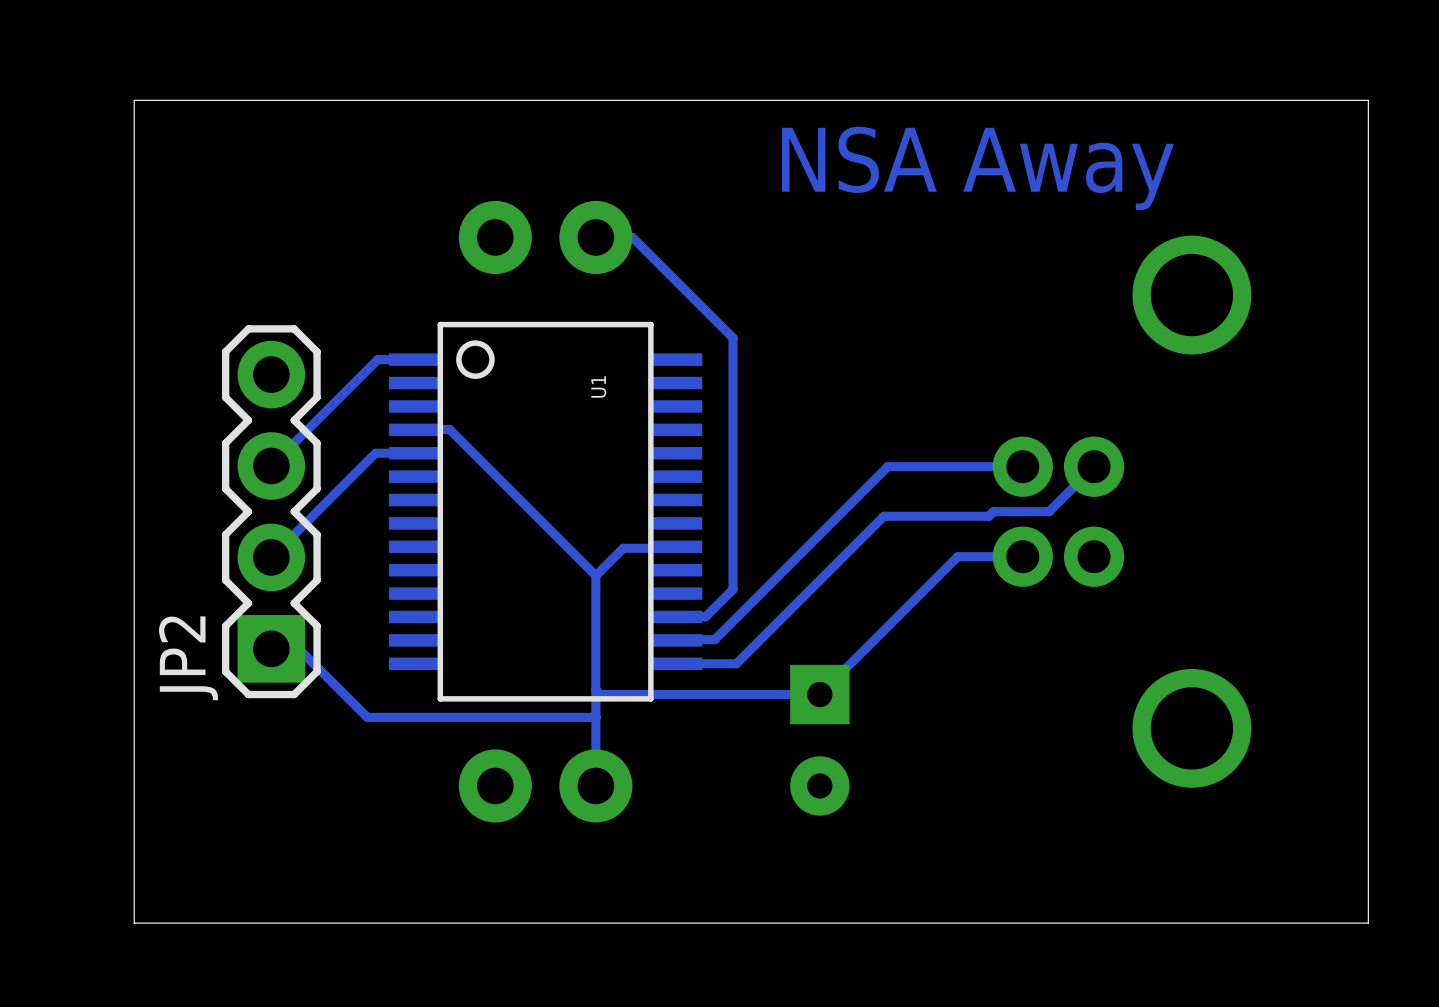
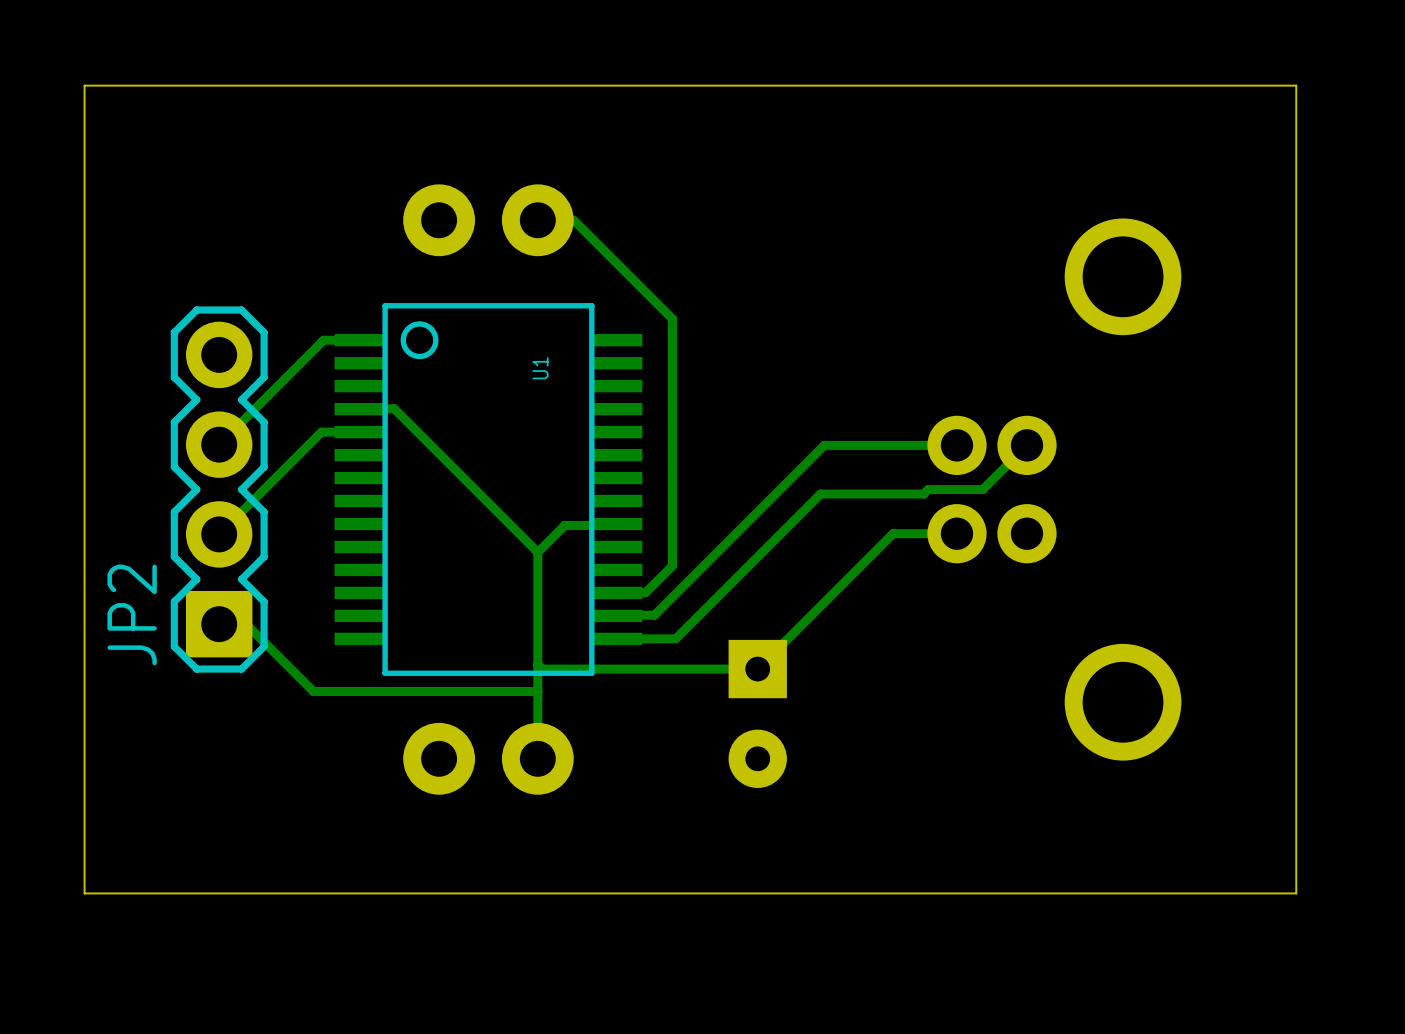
text: NSA Away (977, 168) -> none

